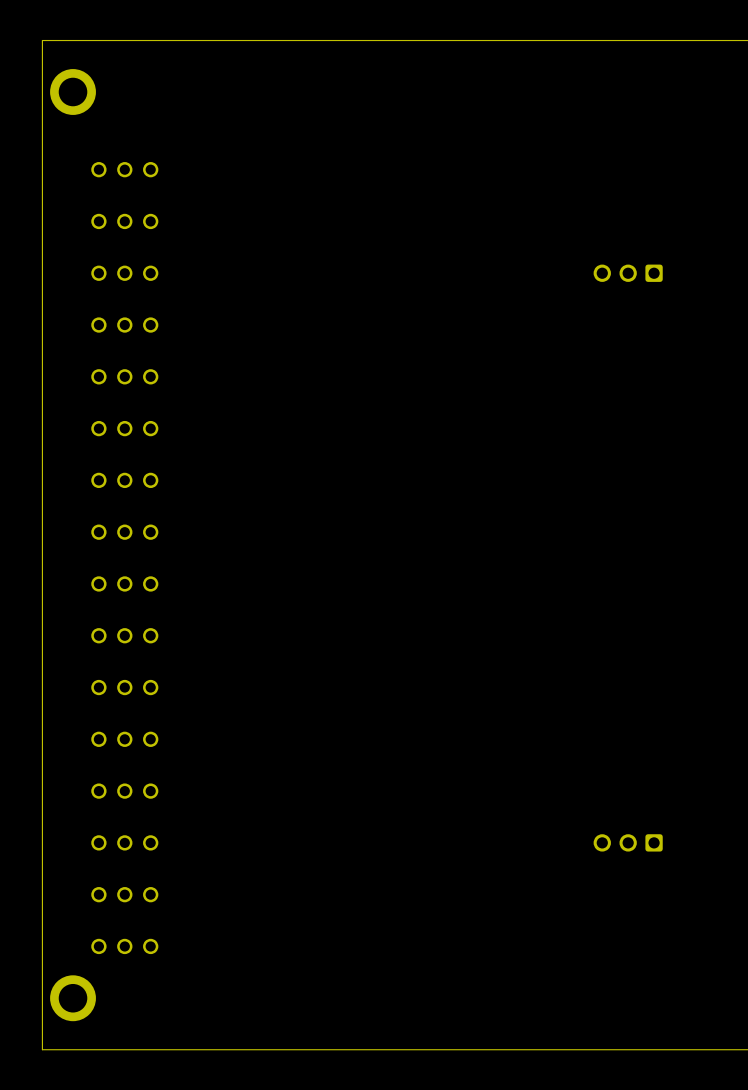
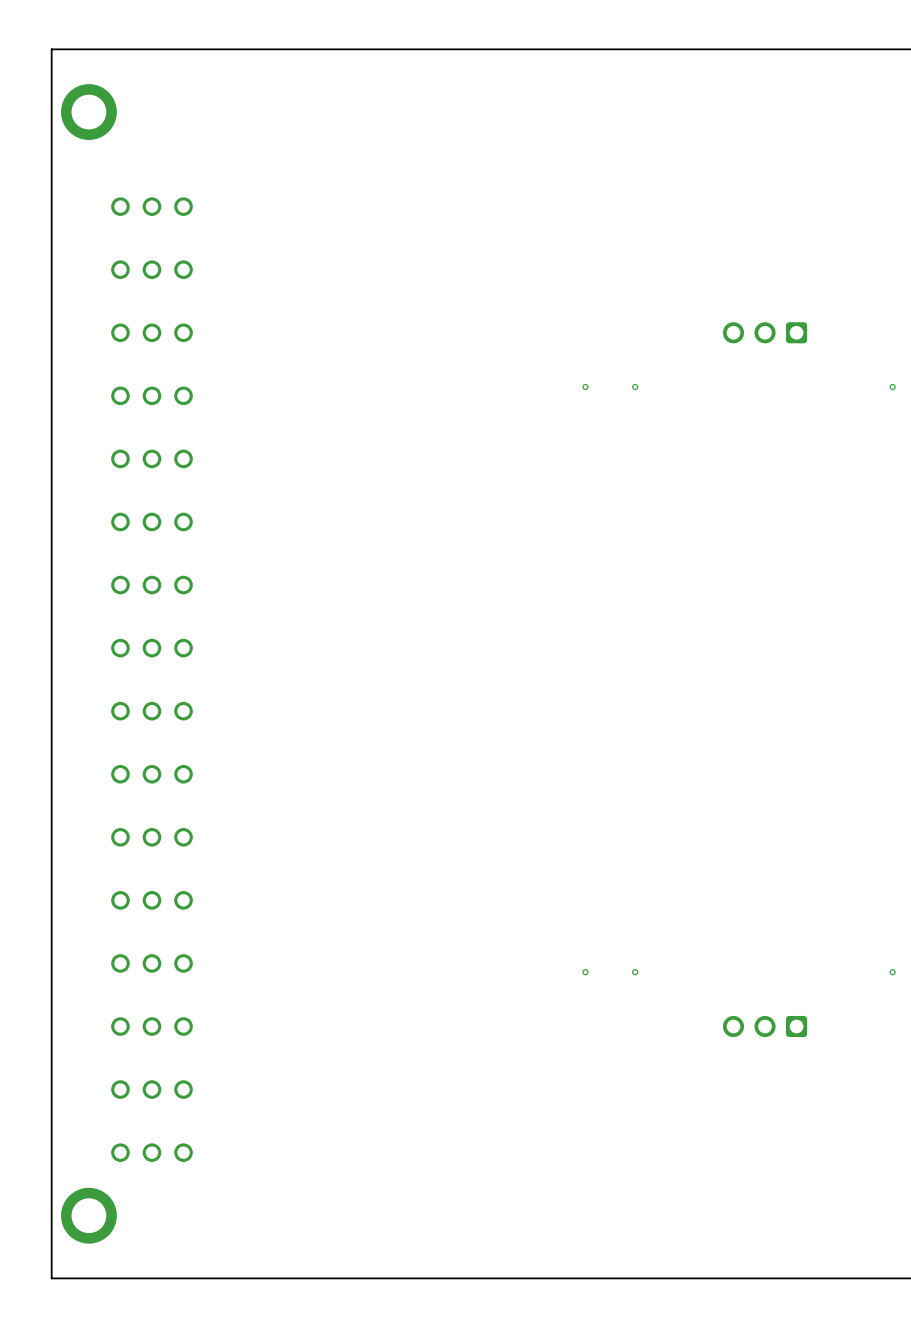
via: none -> (585, 387)
via: none -> (635, 387)
via: none -> (892, 387)
via: none -> (585, 972)
via: none -> (635, 972)
via: none -> (892, 972)

